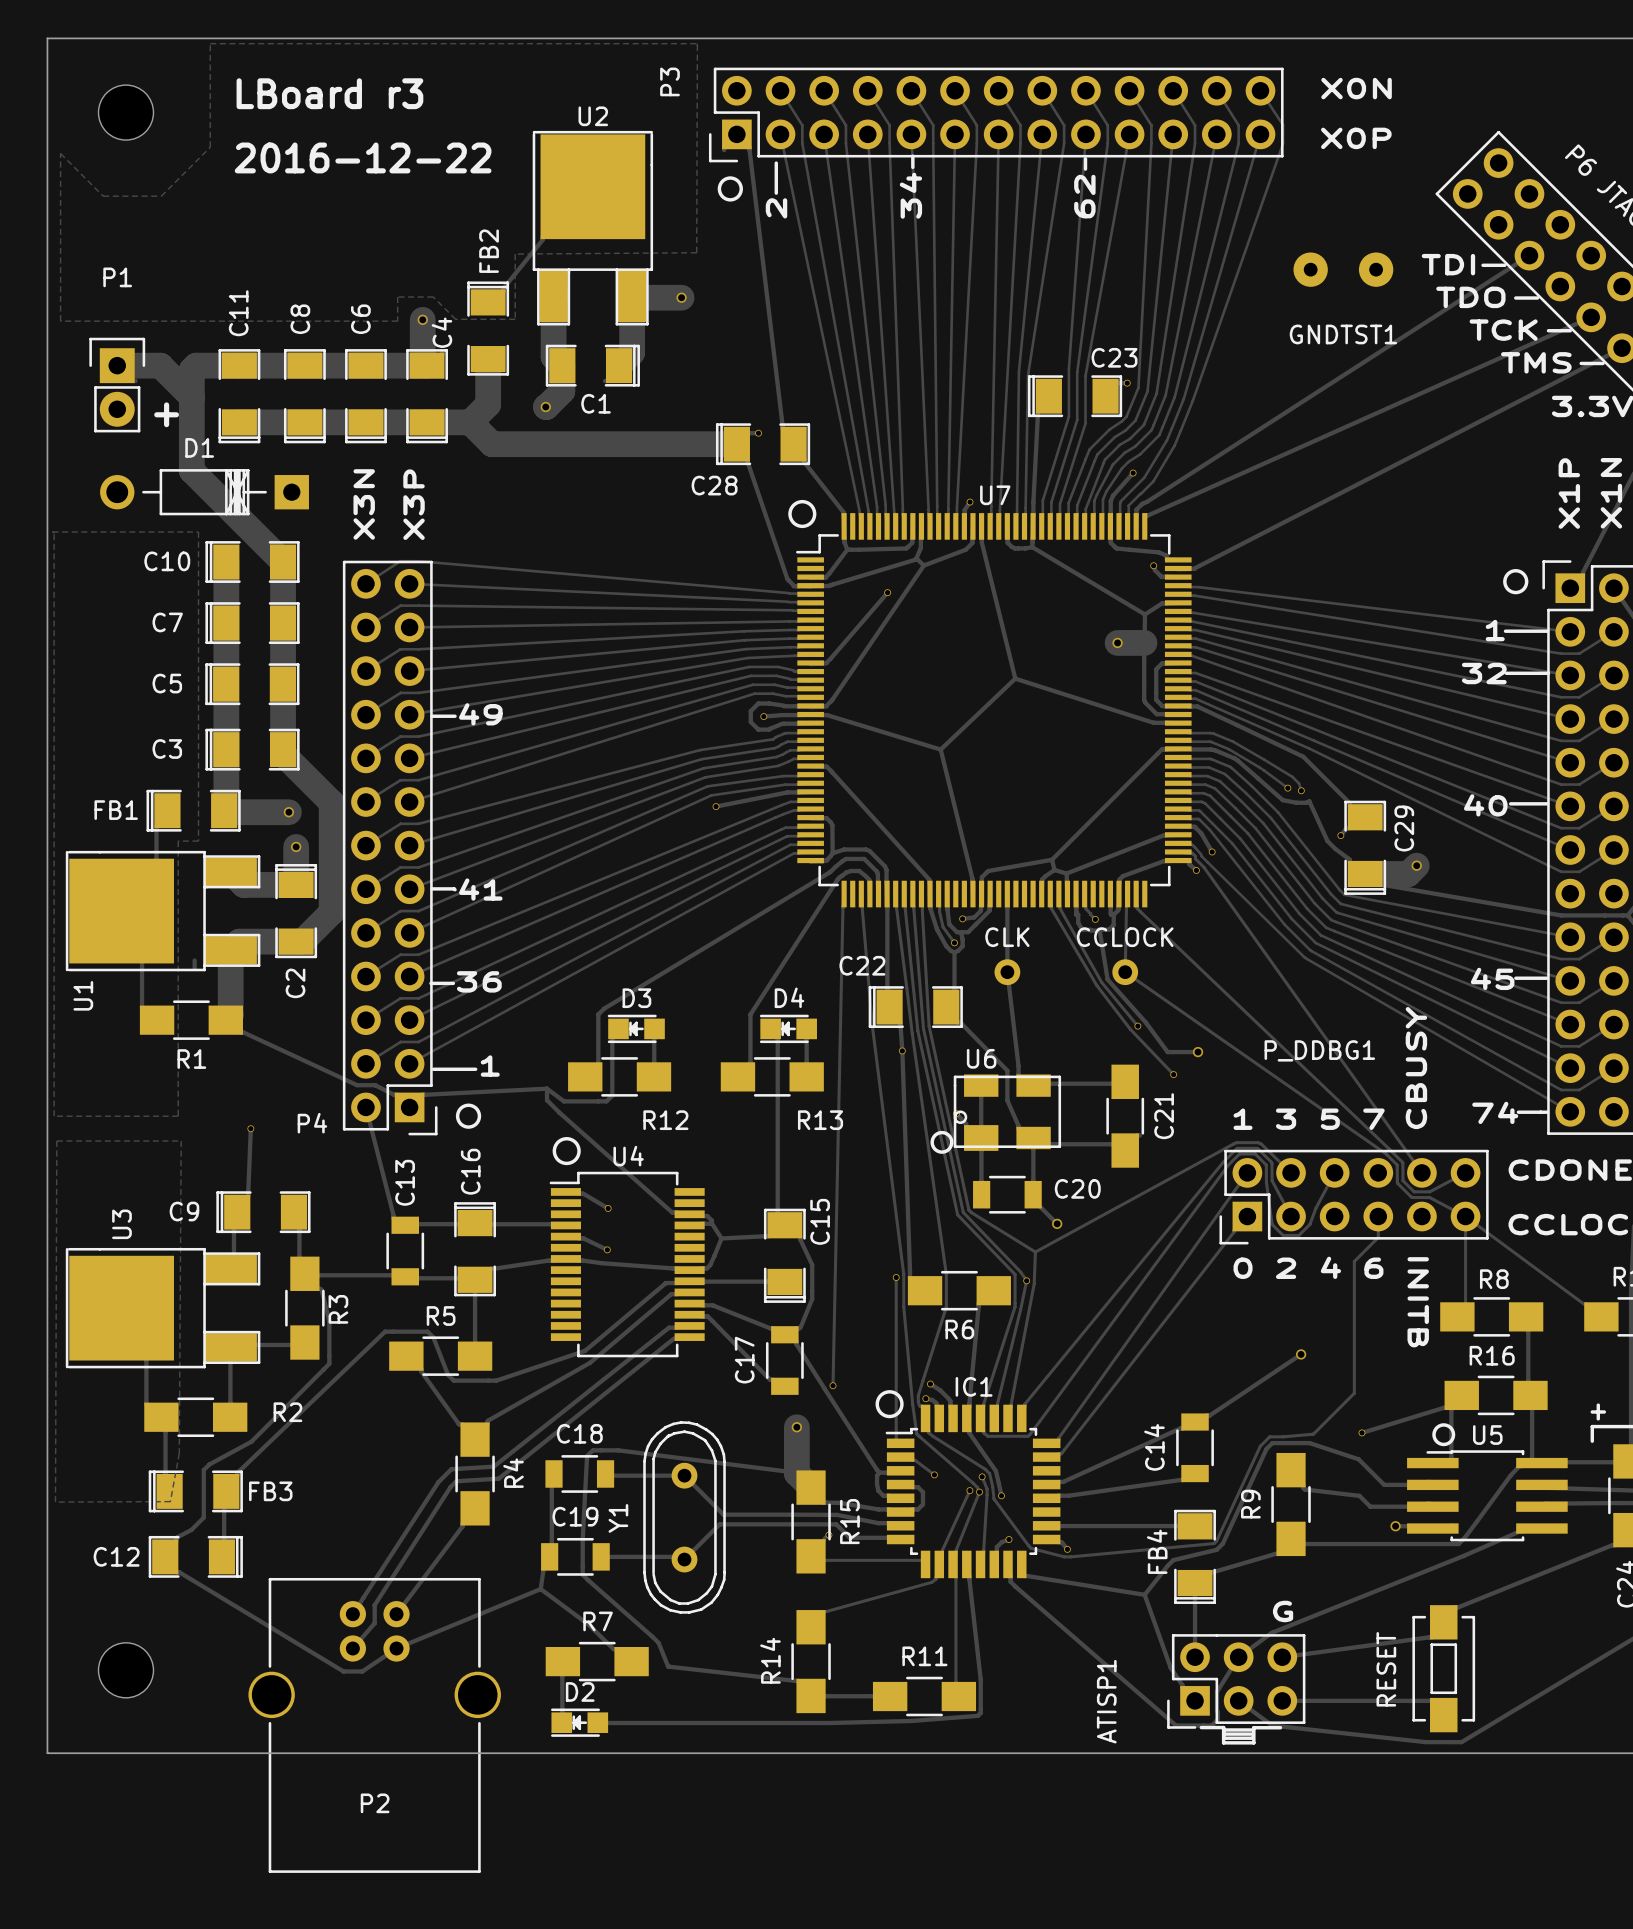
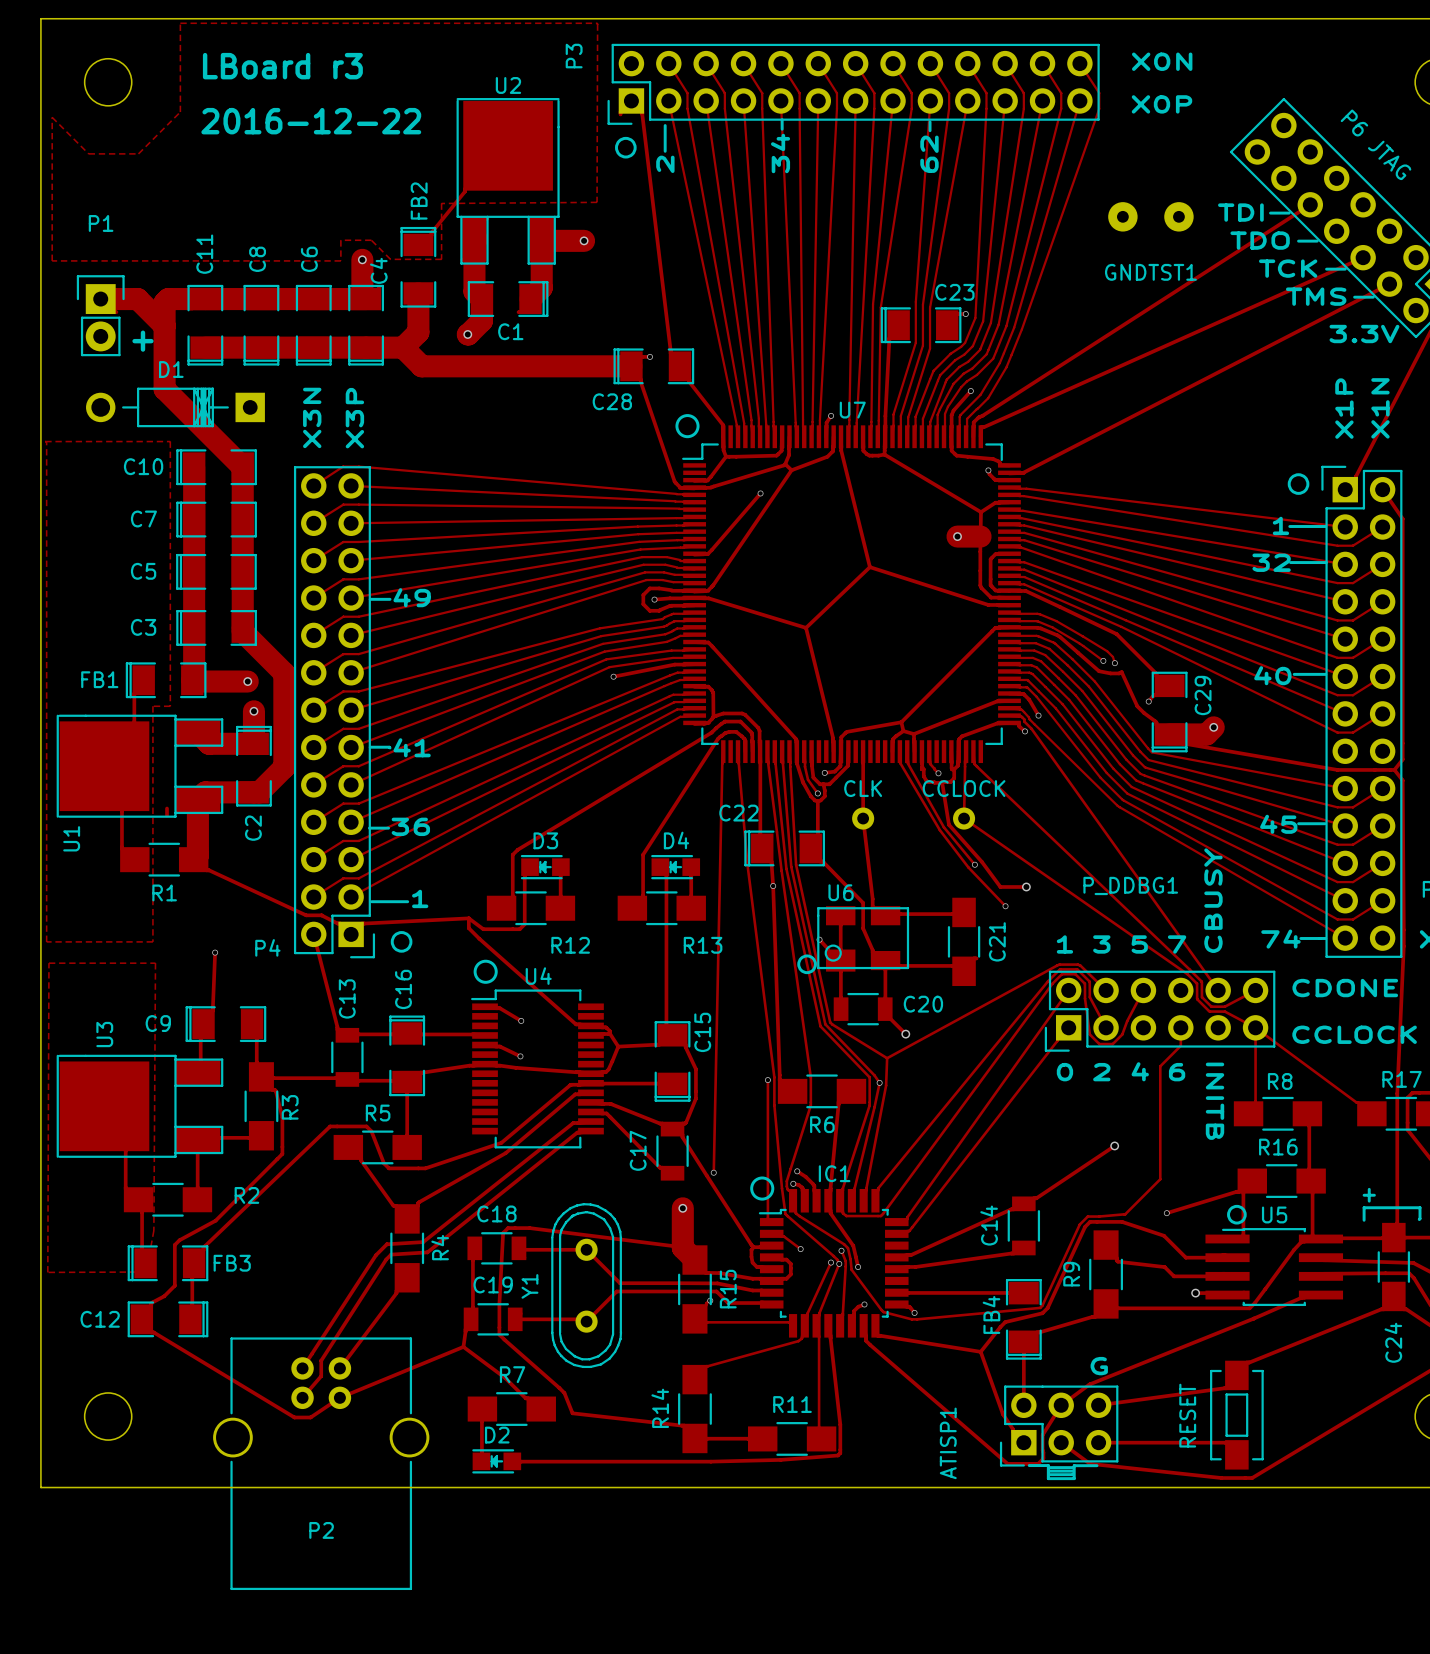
U6 footprint: [953, 1074, 1062, 1151] -> [817, 906, 910, 972]

